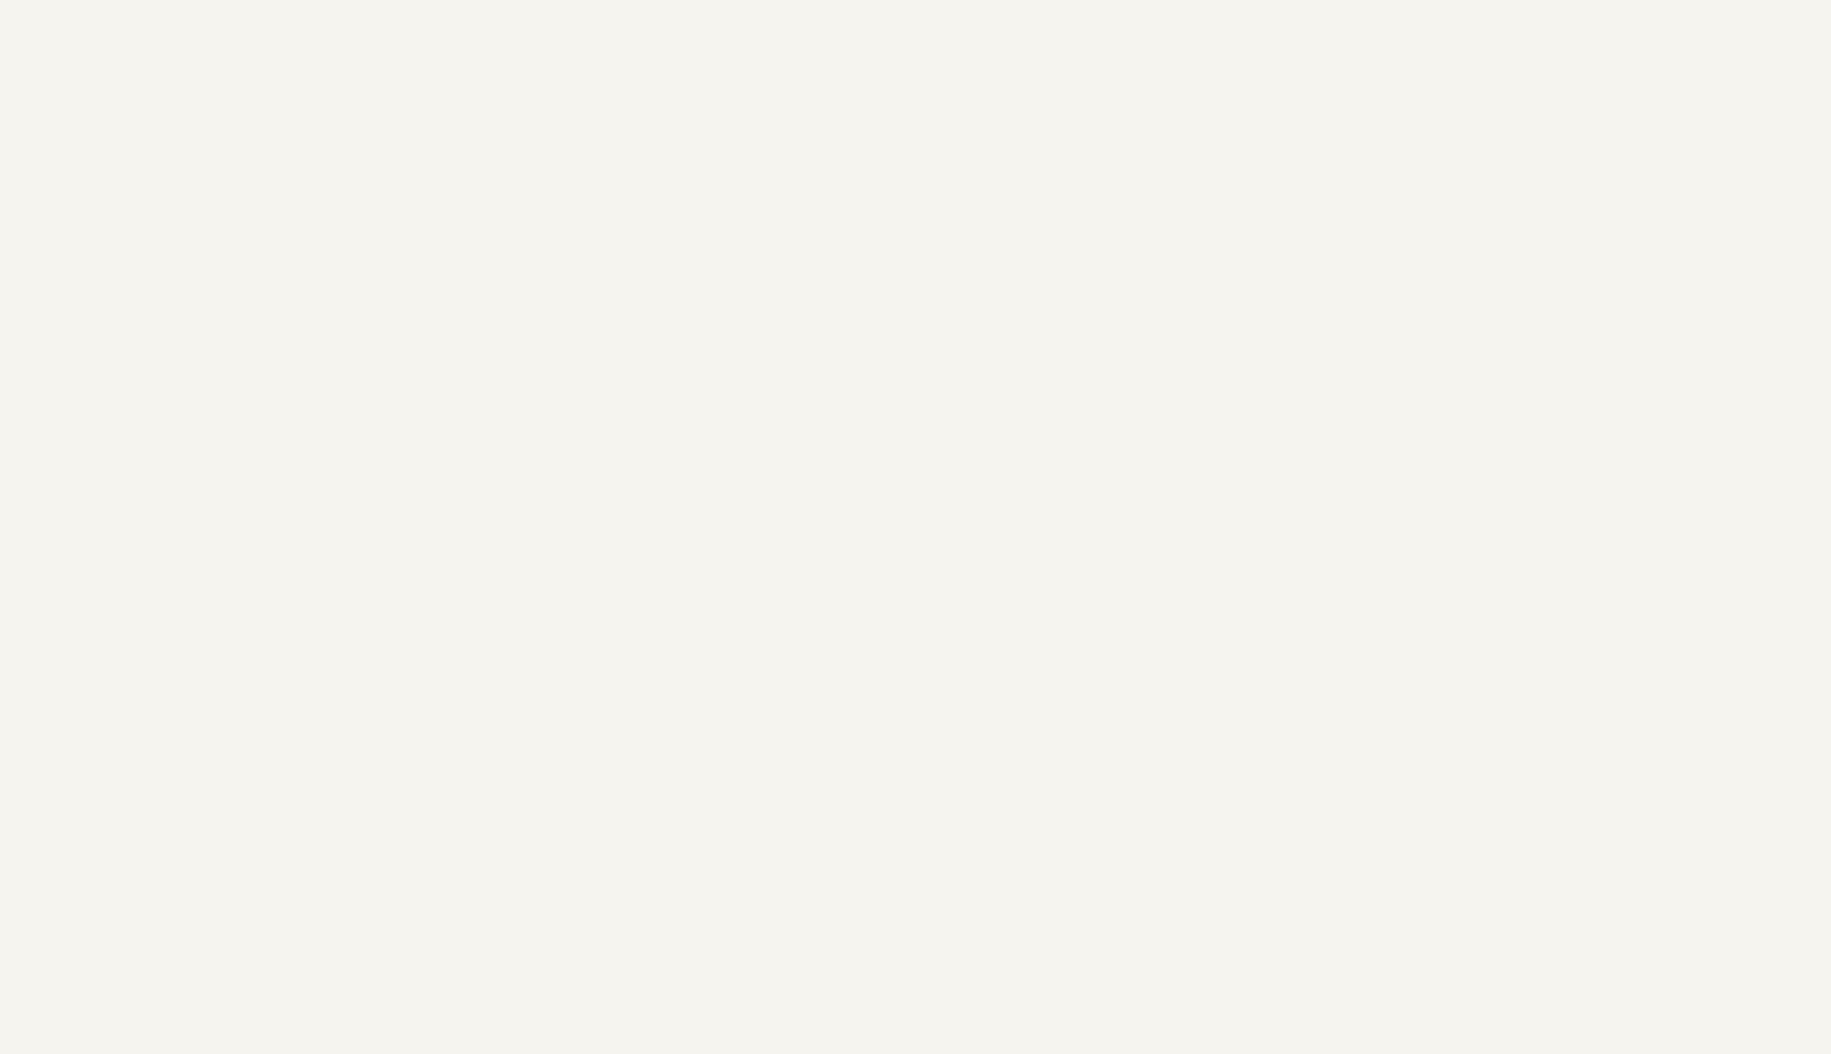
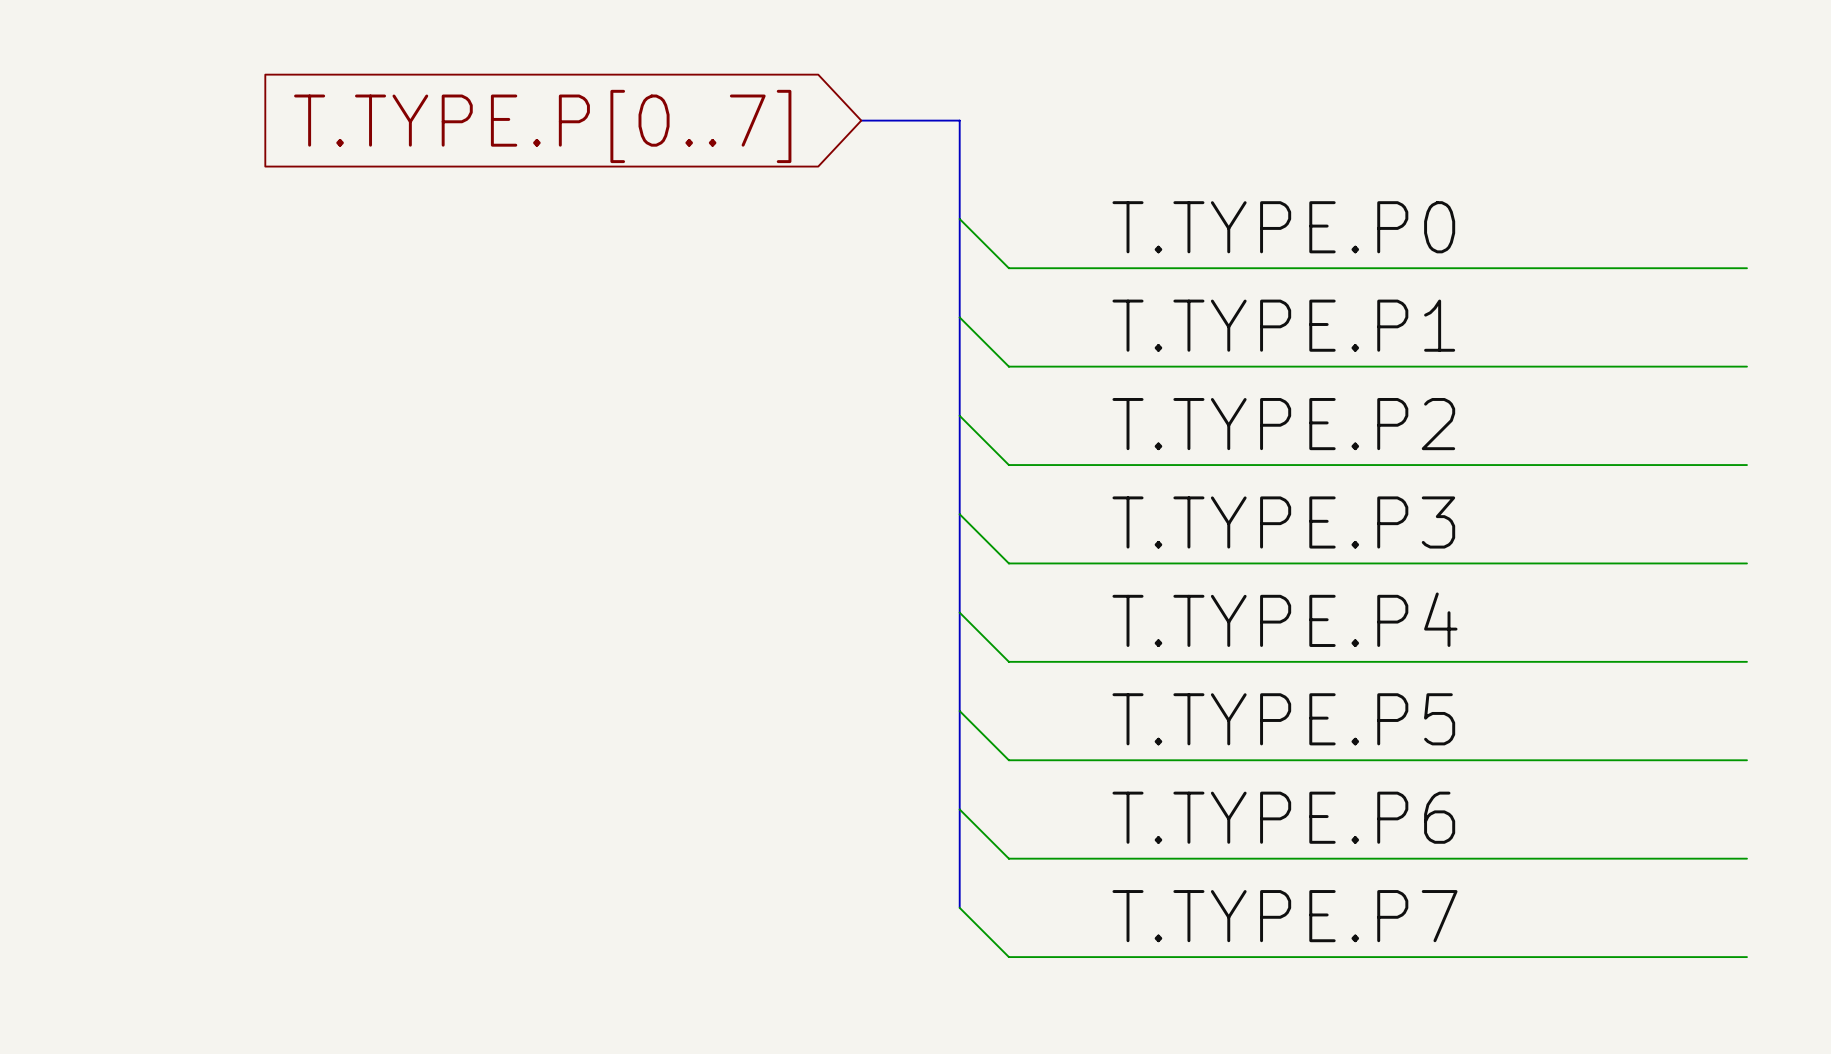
bus: none -> (861, 120) (959, 120) (959, 907)
global label: none -> T.TYPE.P[0..7] (542, 126)
wire: none -> (959, 219) (1008, 268) (1746, 268)
label: none -> T.TYPE.P0 (1283, 227)
wire: none -> (959, 317) (1008, 366) (1746, 366)
label: none -> T.TYPE.P1 (1283, 325)
wire: none -> (959, 415) (1008, 465) (1746, 465)
label: none -> T.TYPE.P2 (1283, 424)
wire: none -> (959, 514) (1008, 563) (1746, 563)
label: none -> T.TYPE.P3 (1283, 522)
wire: none -> (959, 612) (1008, 661) (1746, 661)
label: none -> T.TYPE.P4 (1284, 619)
wire: none -> (959, 711) (1008, 760) (1746, 760)
label: none -> T.TYPE.P5 (1283, 719)
wire: none -> (959, 809) (1008, 858) (1746, 858)
label: none -> T.TYPE.P6 (1283, 817)
wire: none -> (959, 907) (1008, 957) (1746, 957)
label: none -> T.TYPE.P7 (1284, 916)

